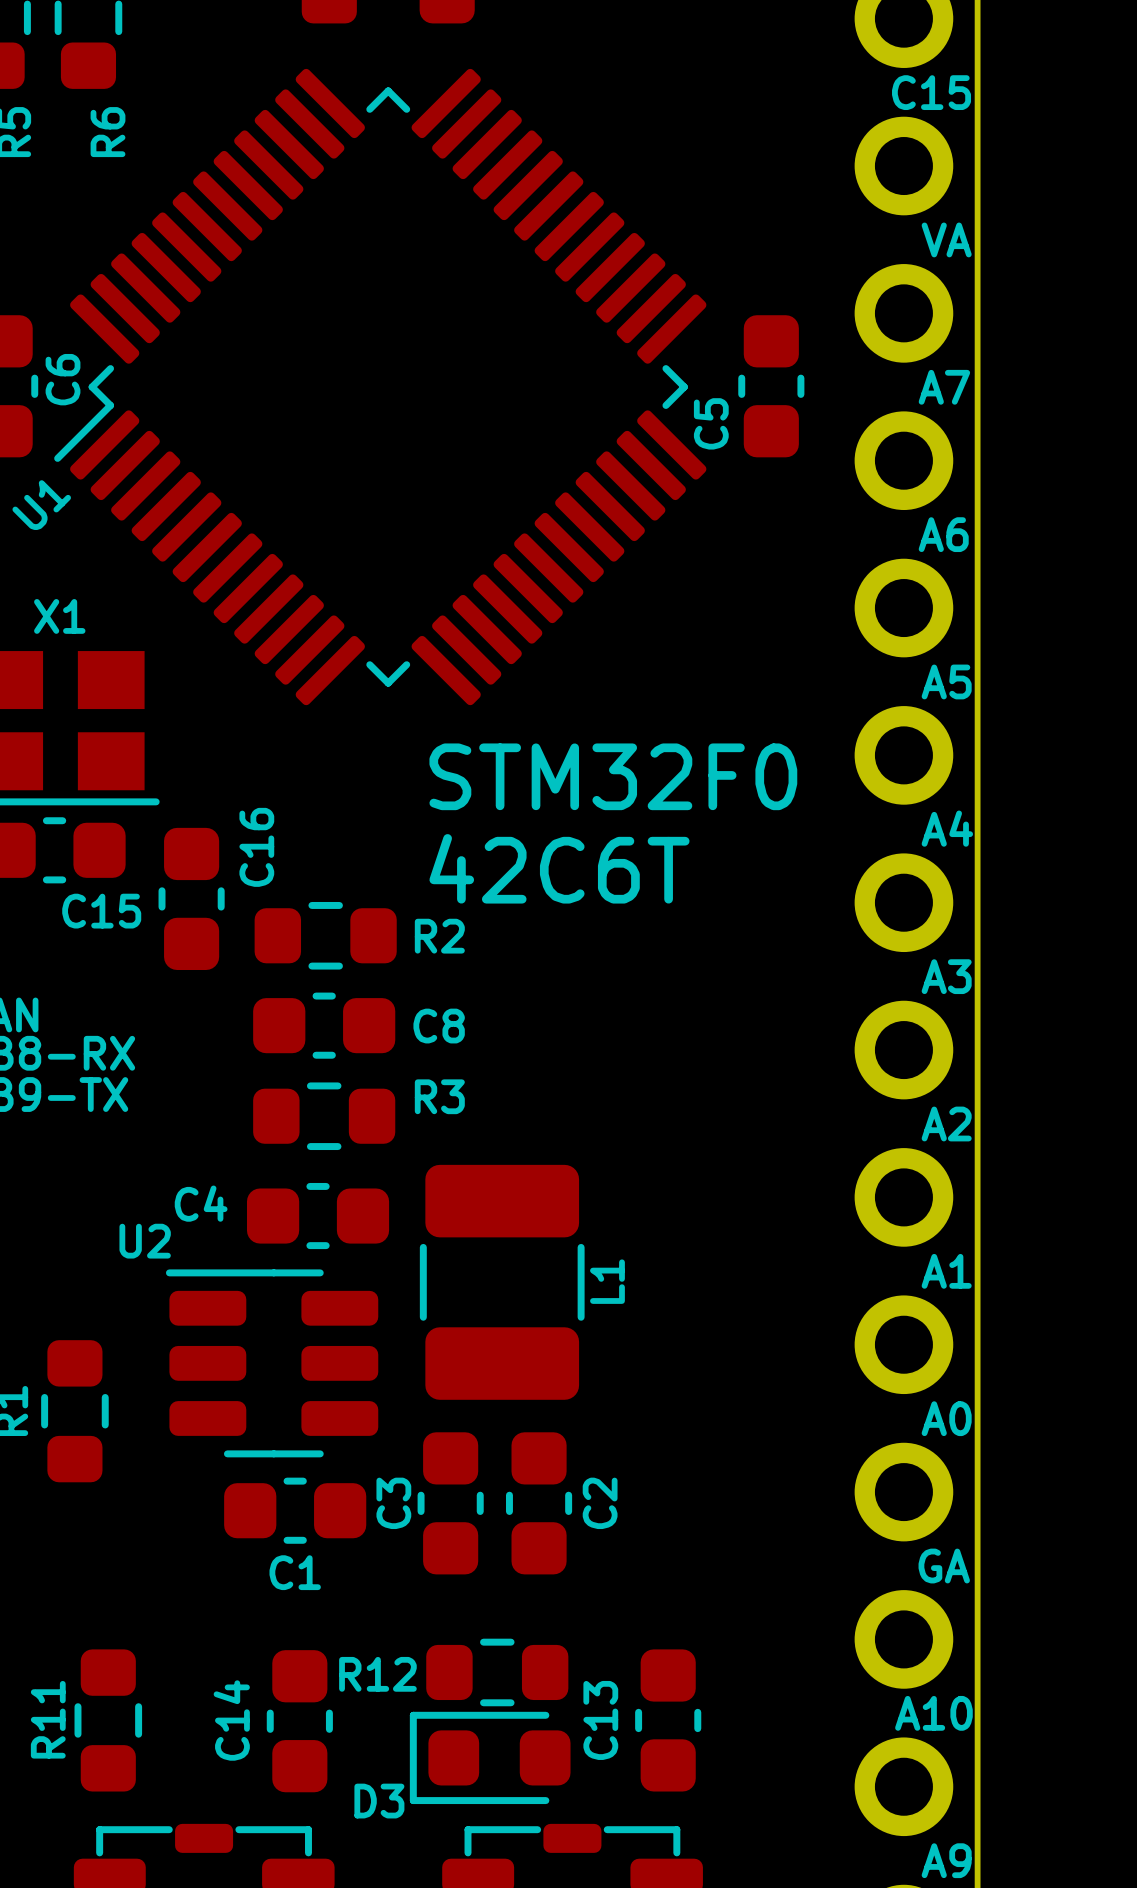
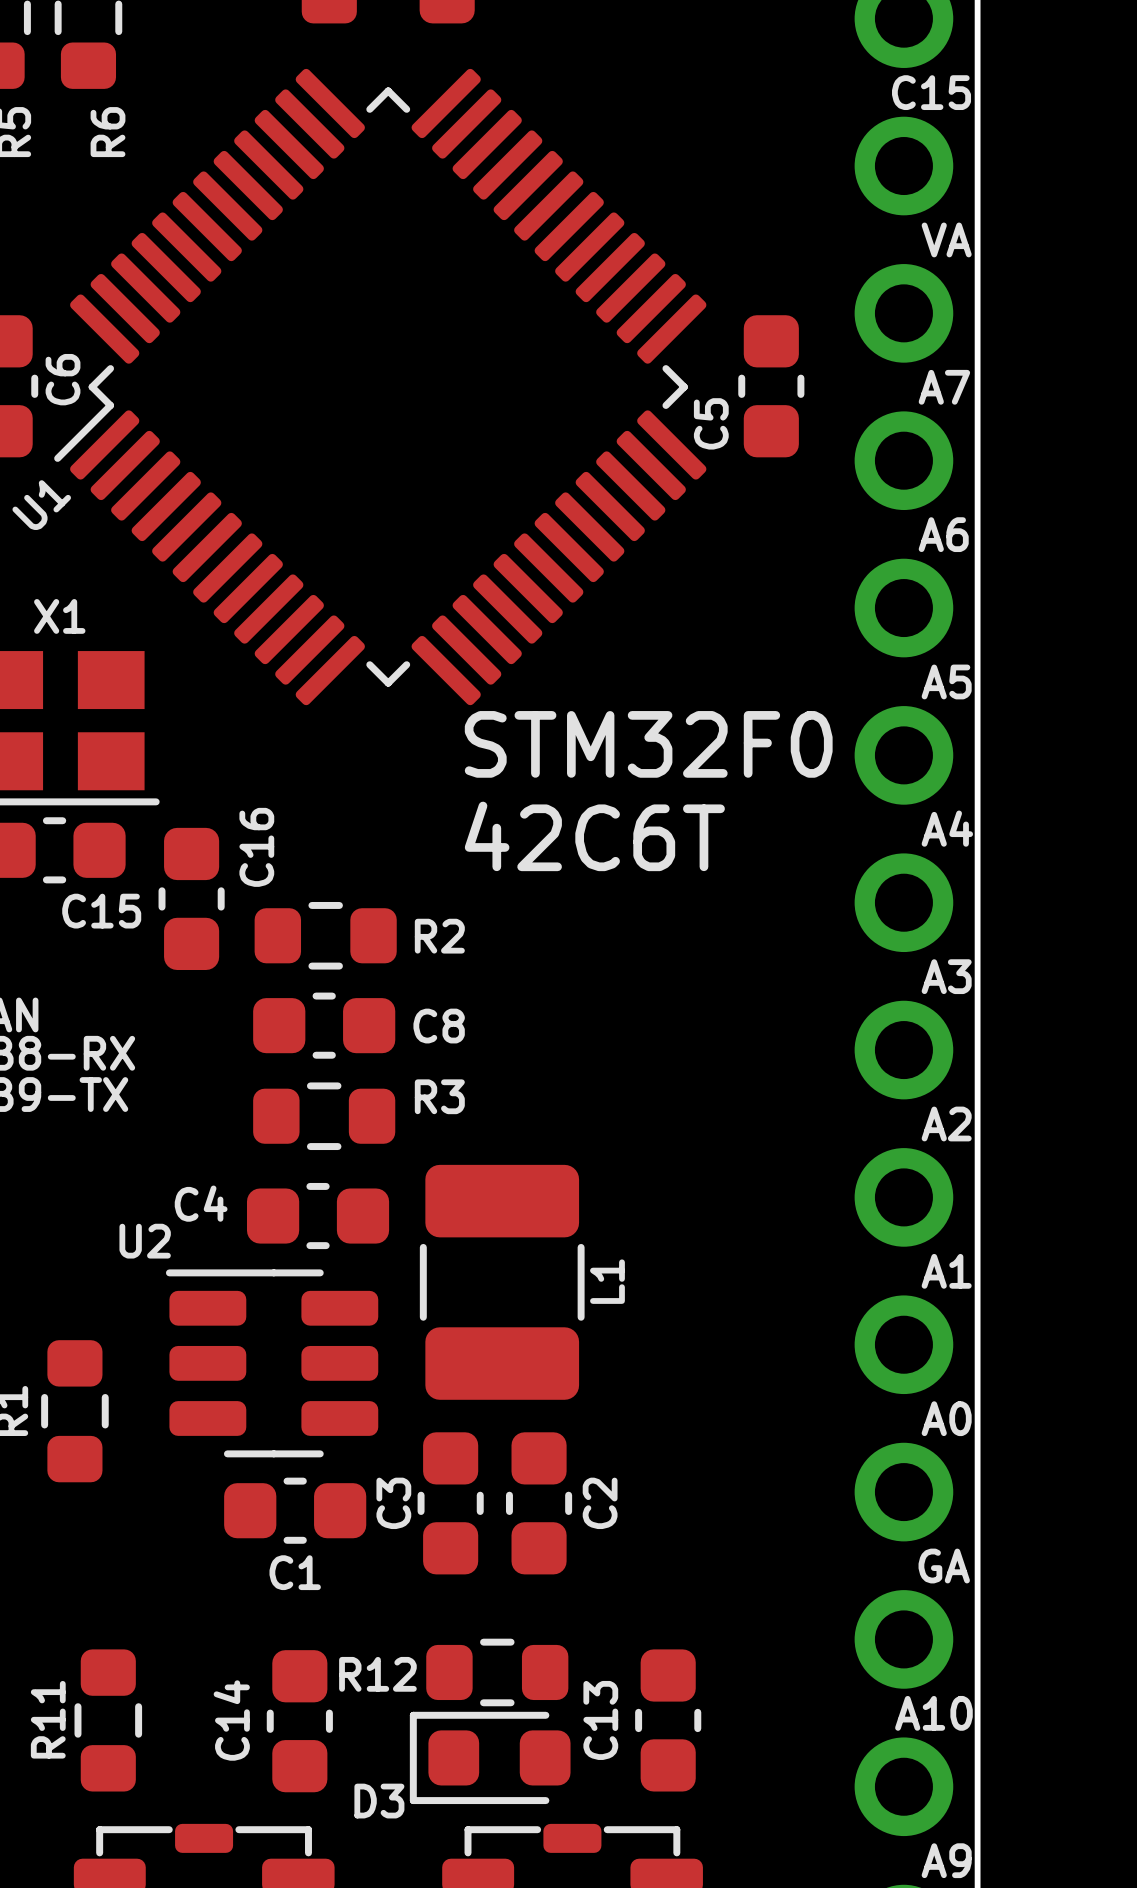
text position: STM32F0 (613, 776) -> STM32F0 (648, 744)
text position: 42C6T (559, 868) -> 42C6T (594, 836)

